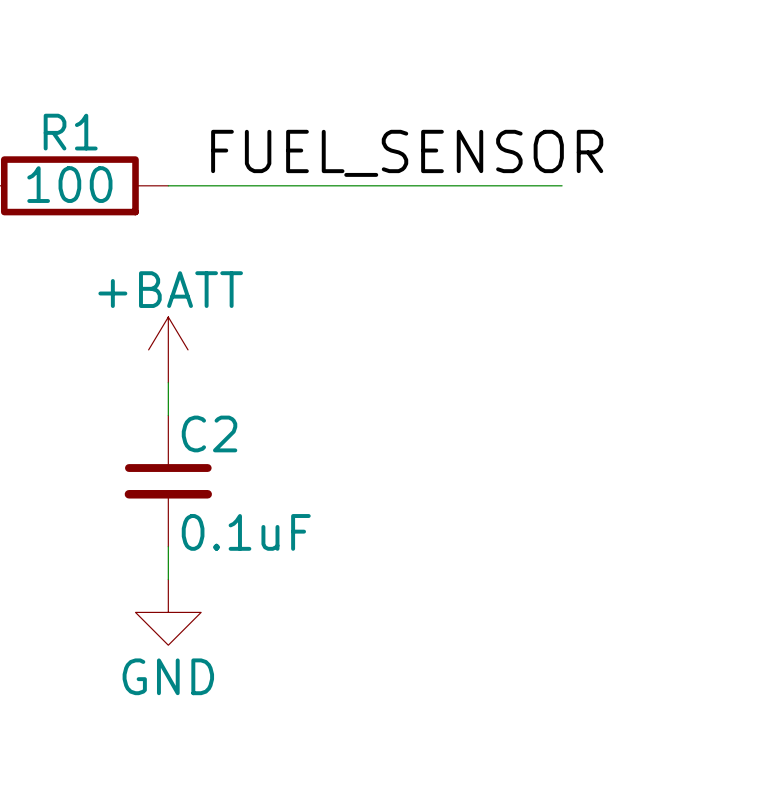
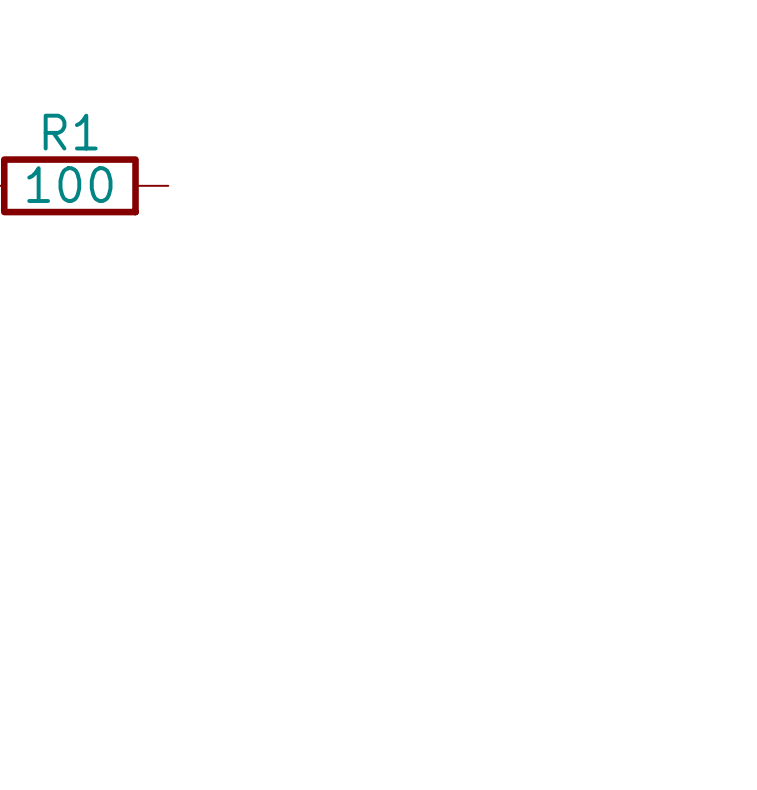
label: FUEL_SENSOR (407, 153) -> none
wire: (168, 185) (562, 185) -> none
power symbol: +BATT (168, 349) -> none
wire: (168, 382) (168, 415) -> none
C2: 0.1uF (168, 481) -> none
wire: (168, 546) (168, 579) -> none
power symbol: GND (168, 612) -> none

